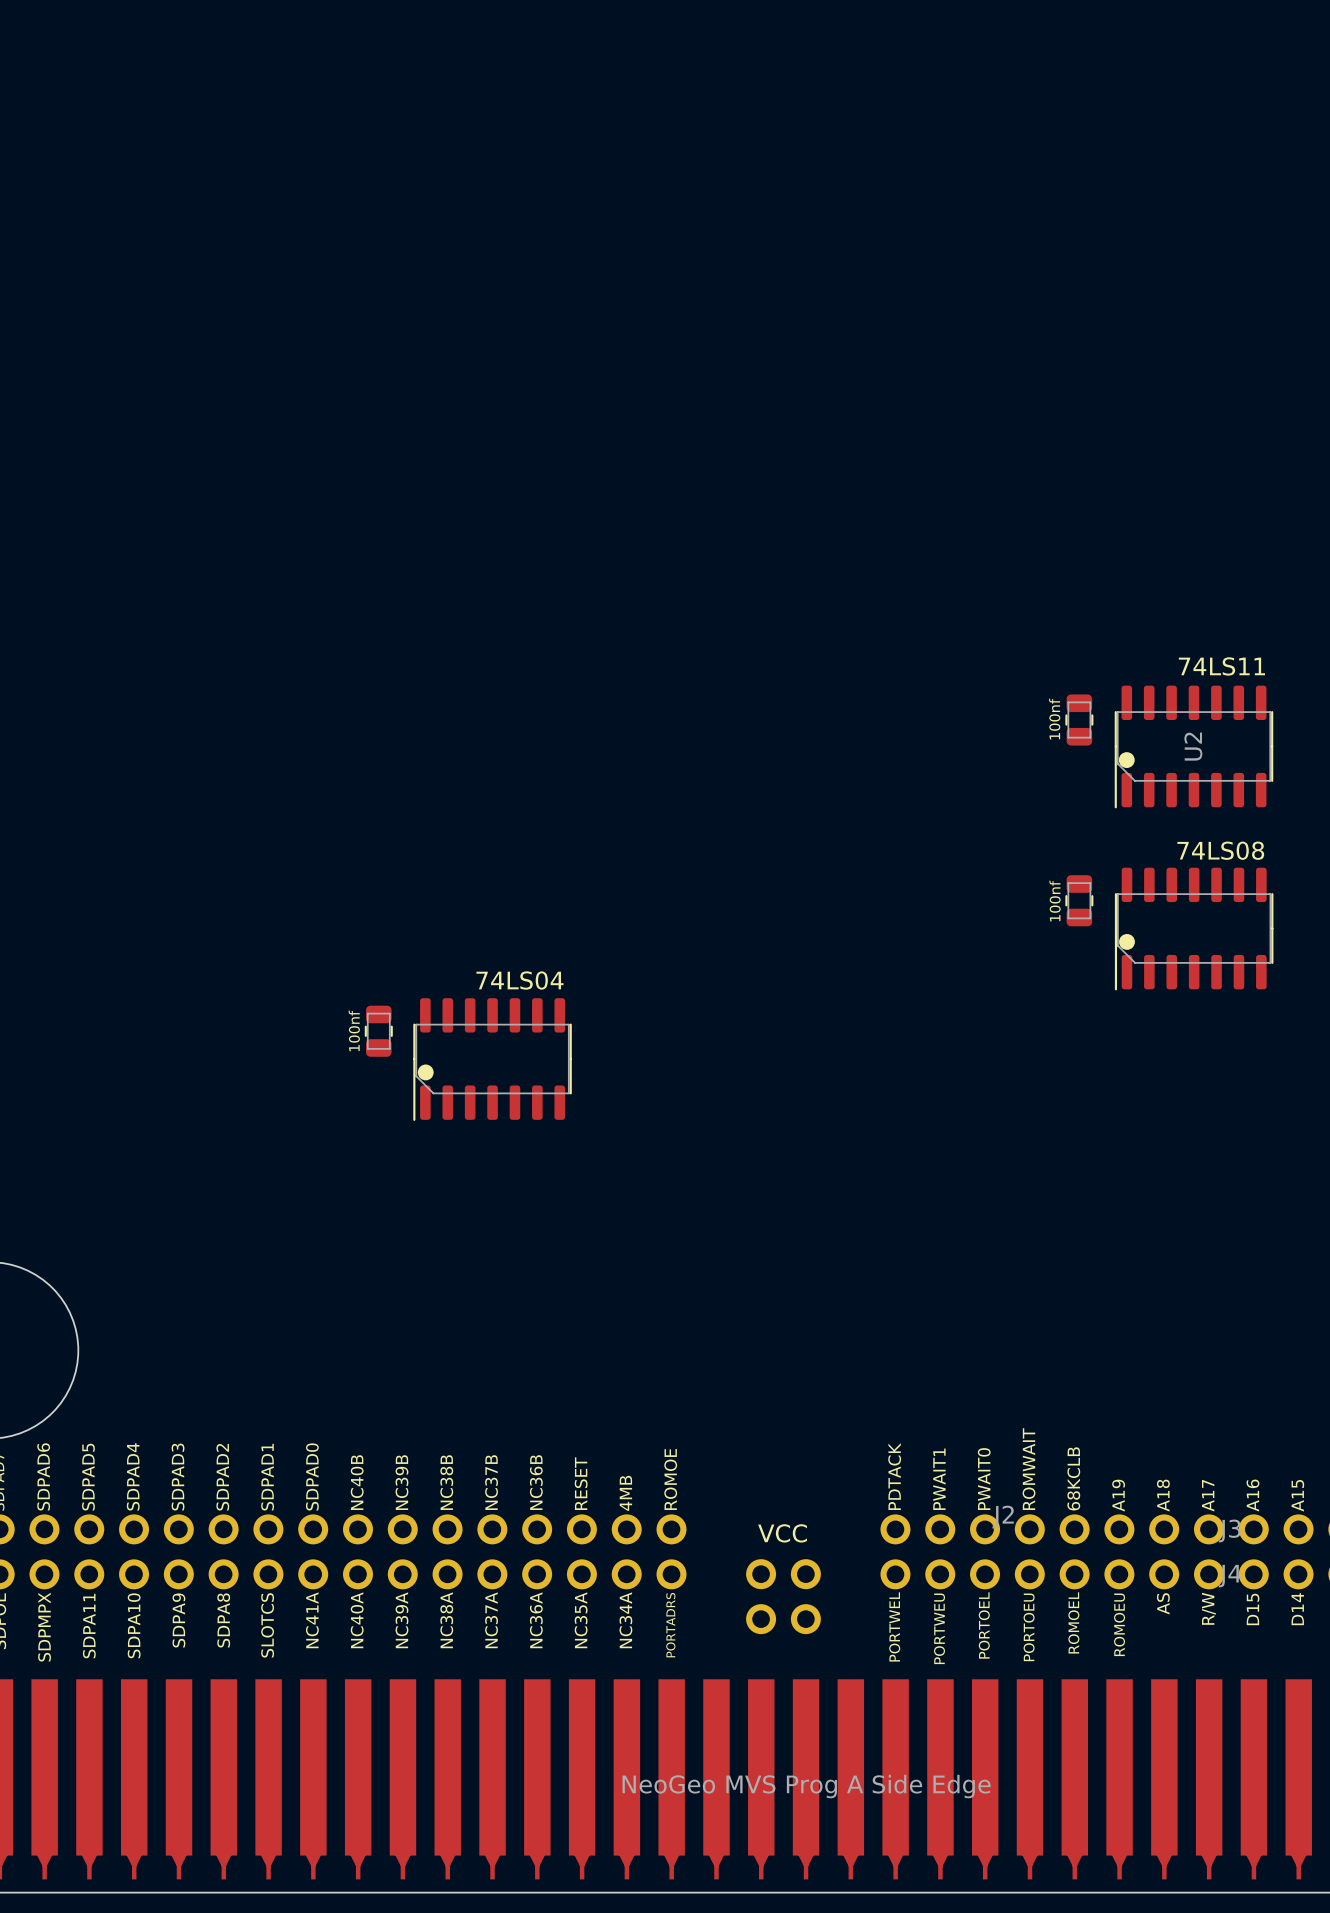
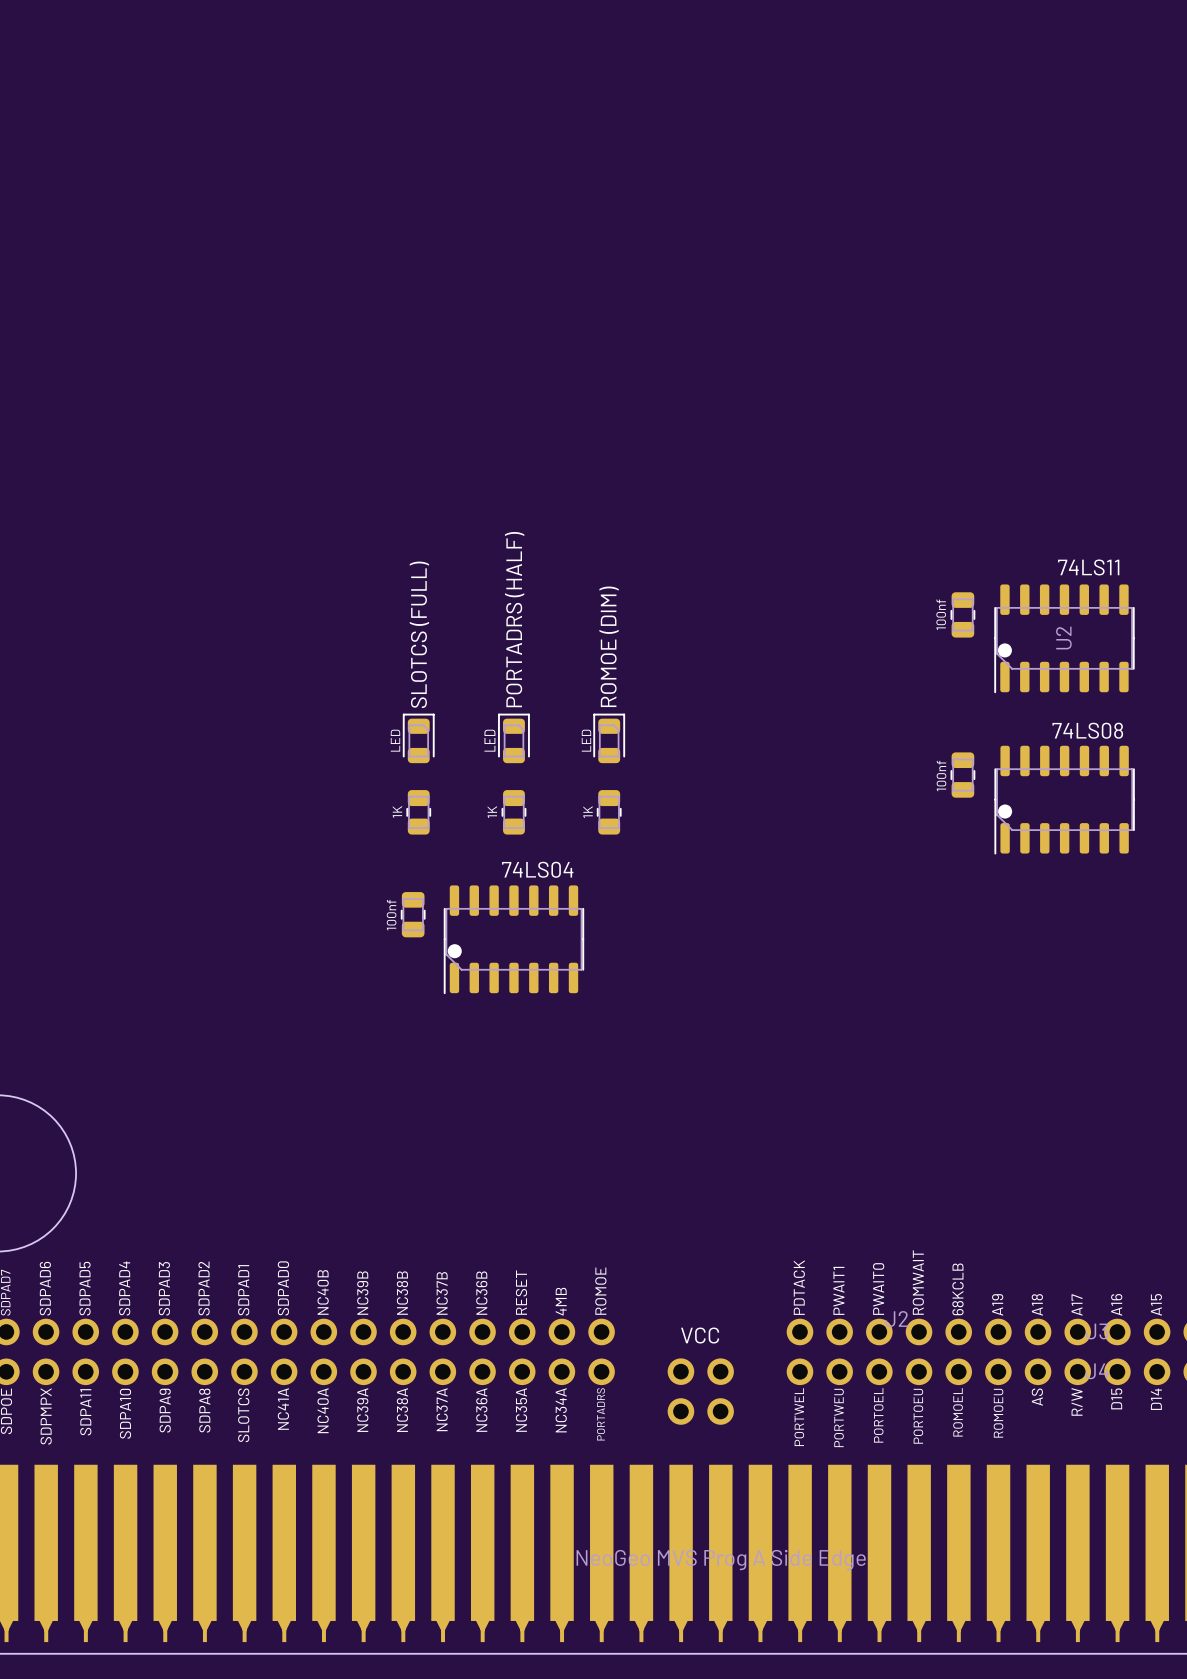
text: none -> PORTADRS (HALF) (514, 619)
text: none -> SLOTCS (FULL) (419, 634)
text: none -> ROMOE (DIM) (609, 646)
part: none -> LED (418, 738)
part: none -> LED (513, 738)
part: none -> LED (609, 738)
part: none -> 1K (418, 812)
part: none -> 1K (513, 812)
part: none -> 1K (609, 812)
part position: (378, 1031) -> (413, 914)
part position: (492, 1059) -> (513, 939)
drawing position: (425, 1072) -> (454, 951)

